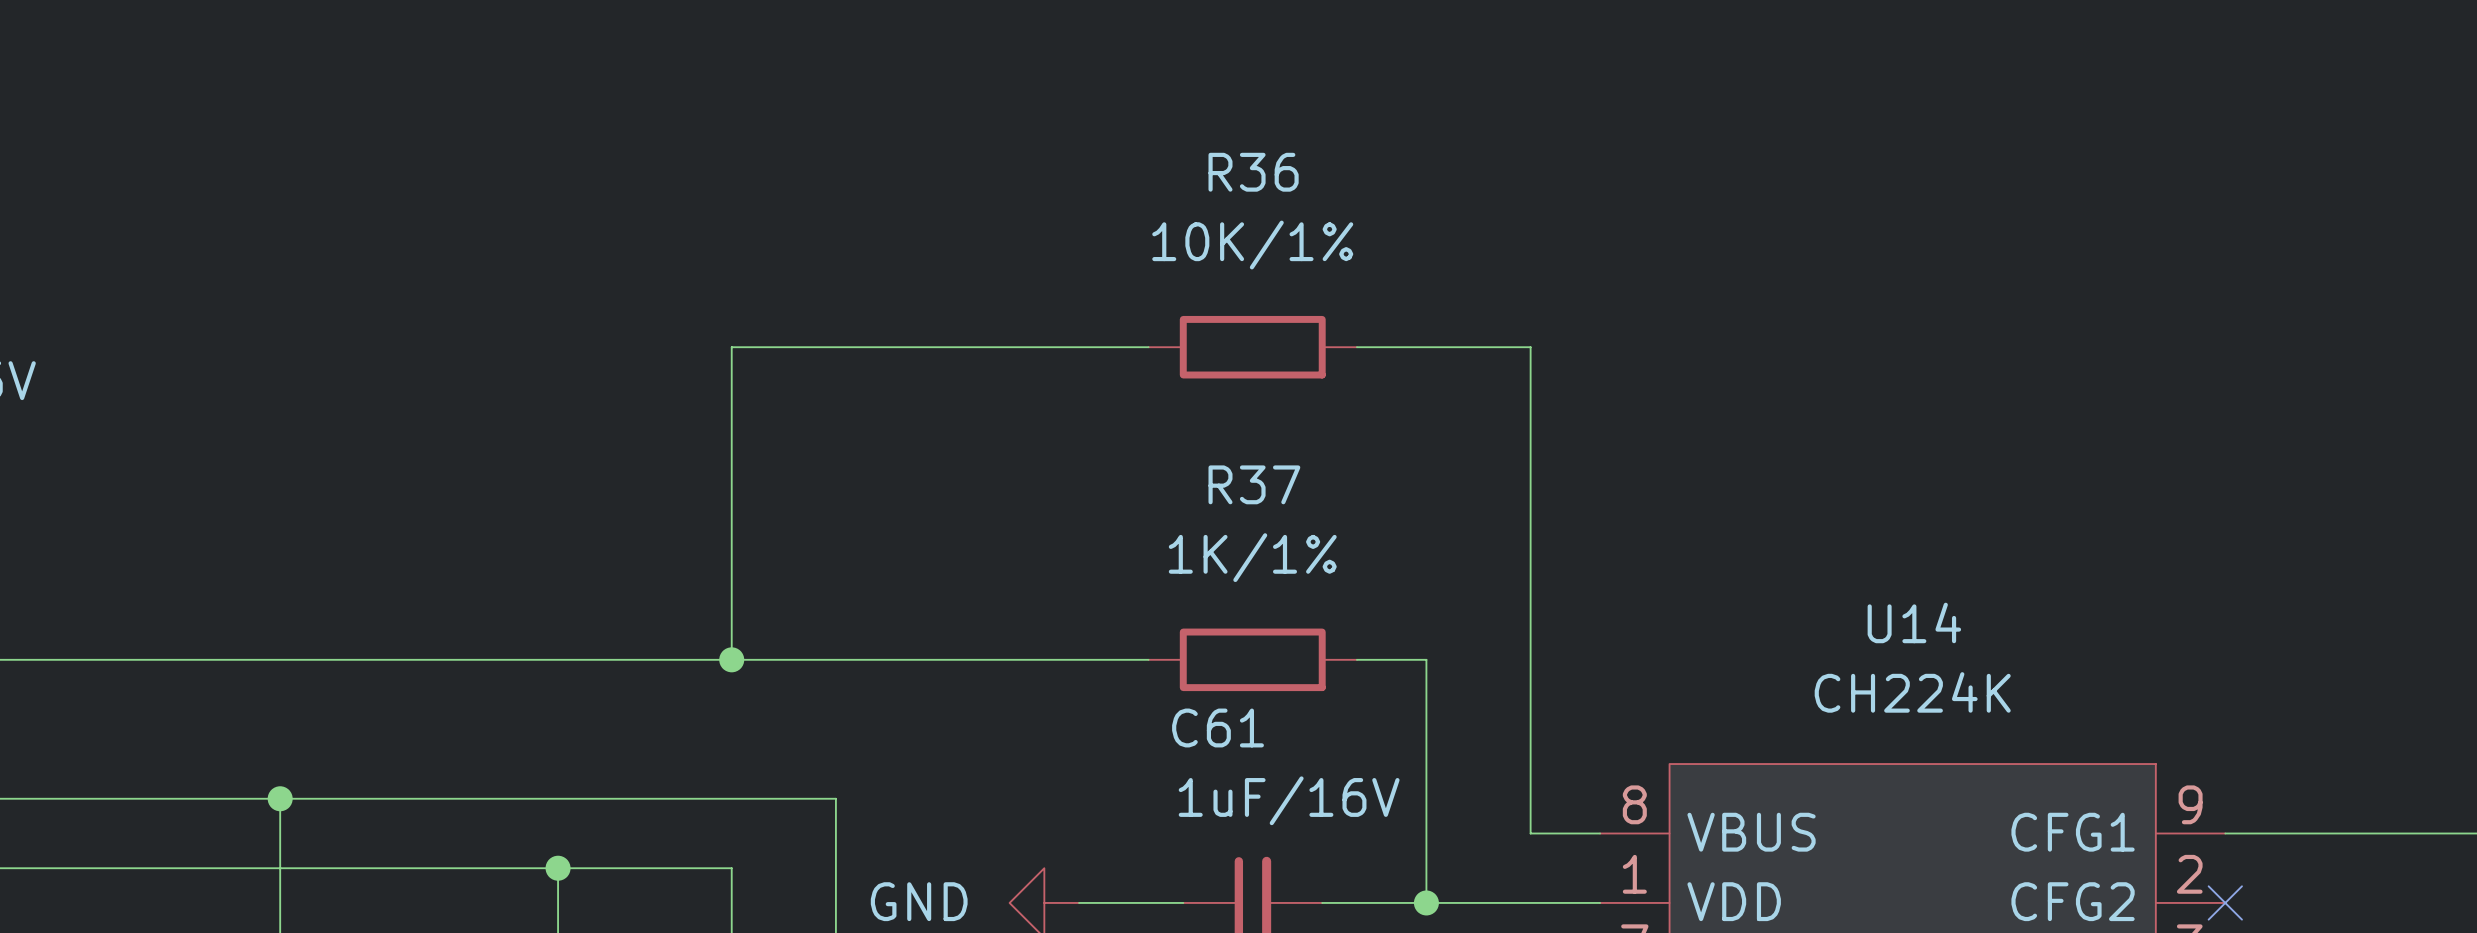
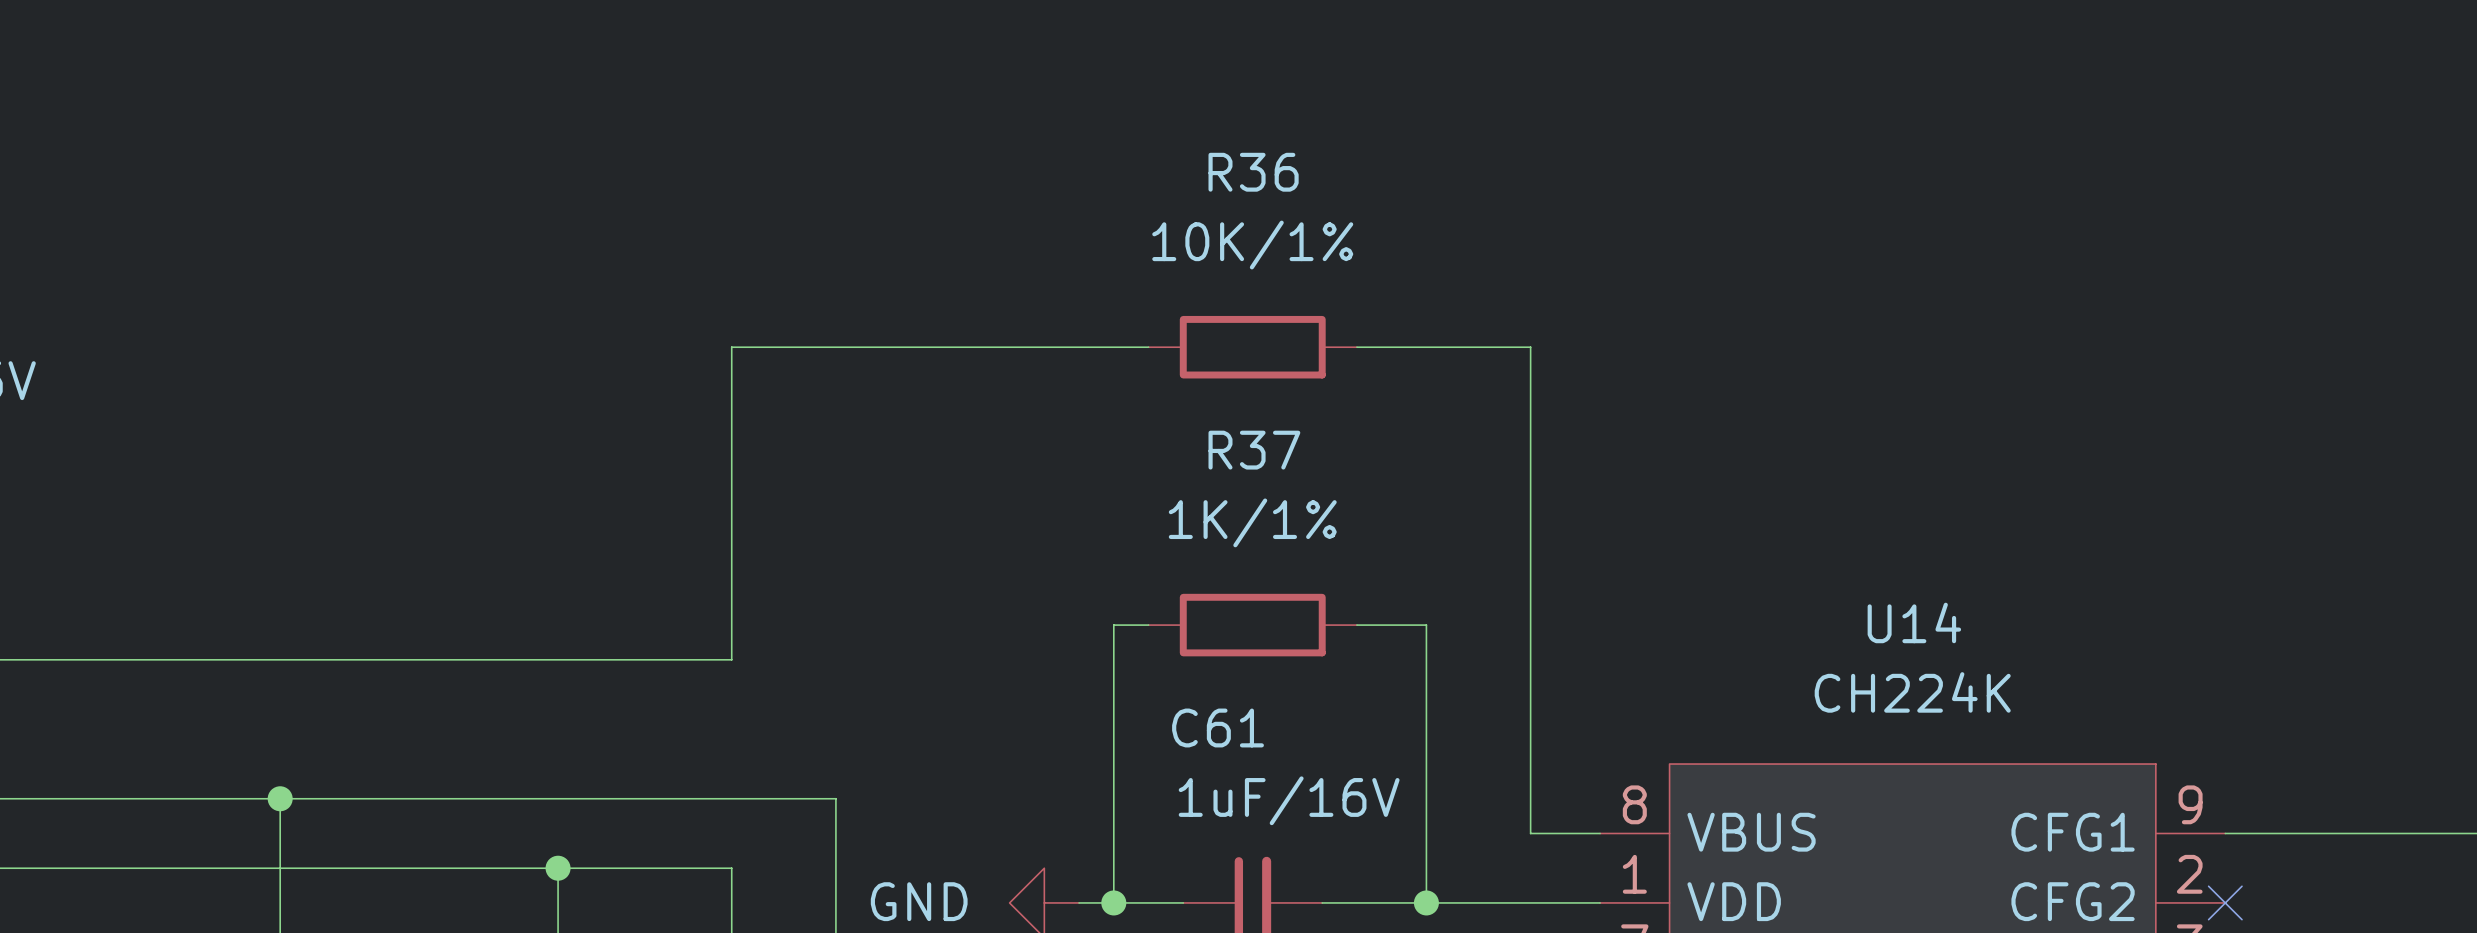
wire: none -> (1148, 625) (1113, 625) (1113, 902)
wire: (731, 659) (1148, 659) -> none
junction: (731, 659) -> none
R37 position: (1252, 659) -> (1252, 625)
wire: (1356, 659) (1426, 659) -> (1356, 625) (1426, 625) (1426, 659)
junction: none -> (1113, 902)

